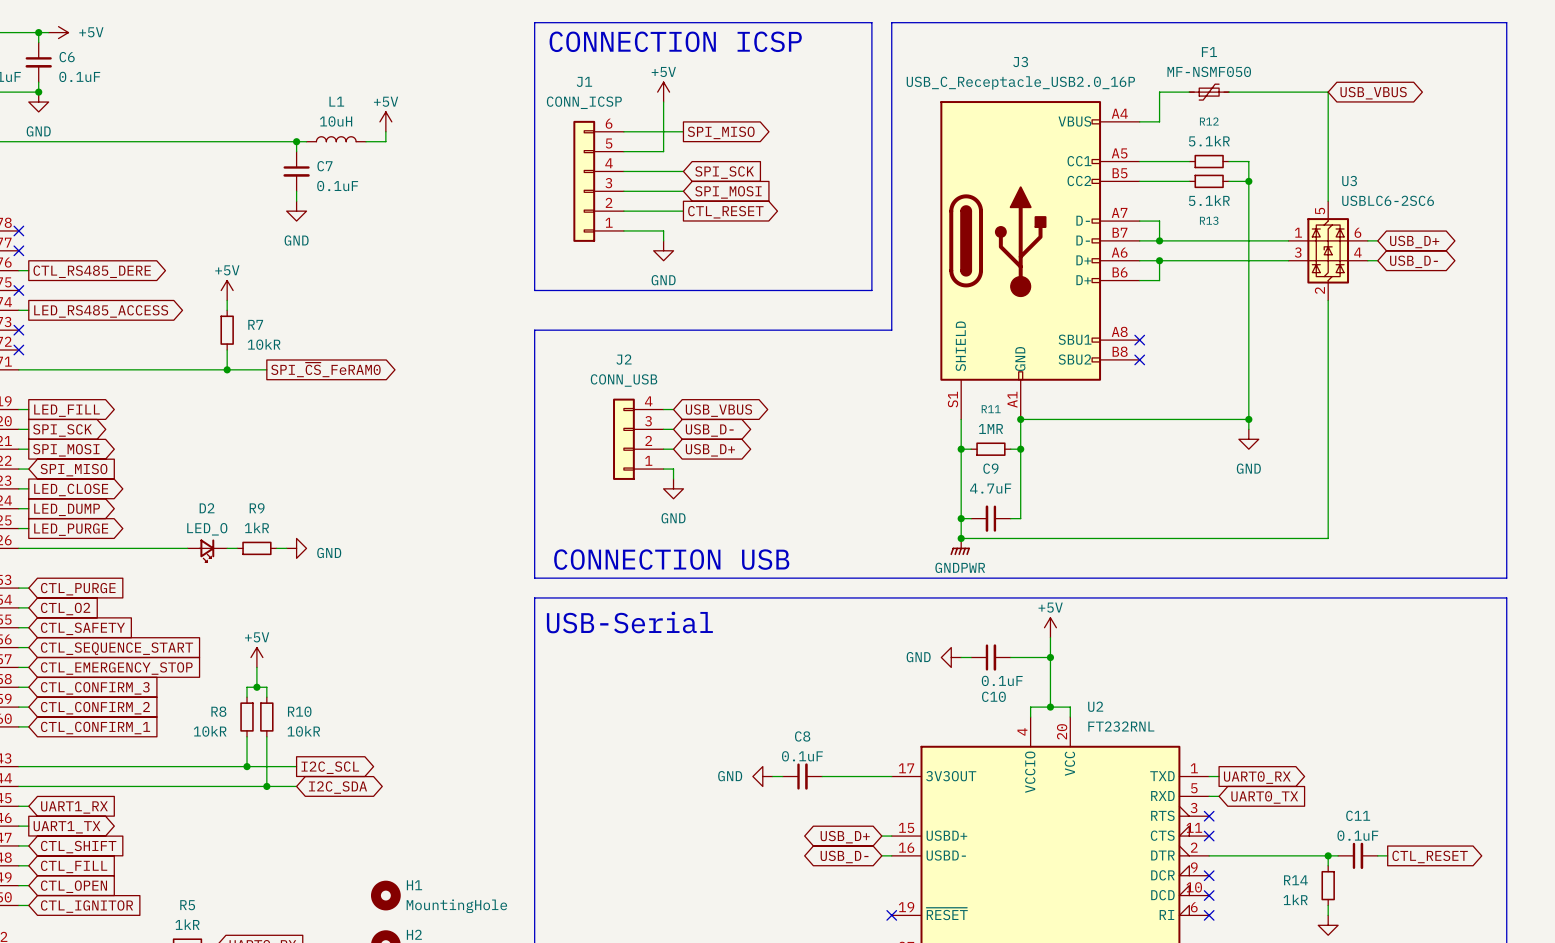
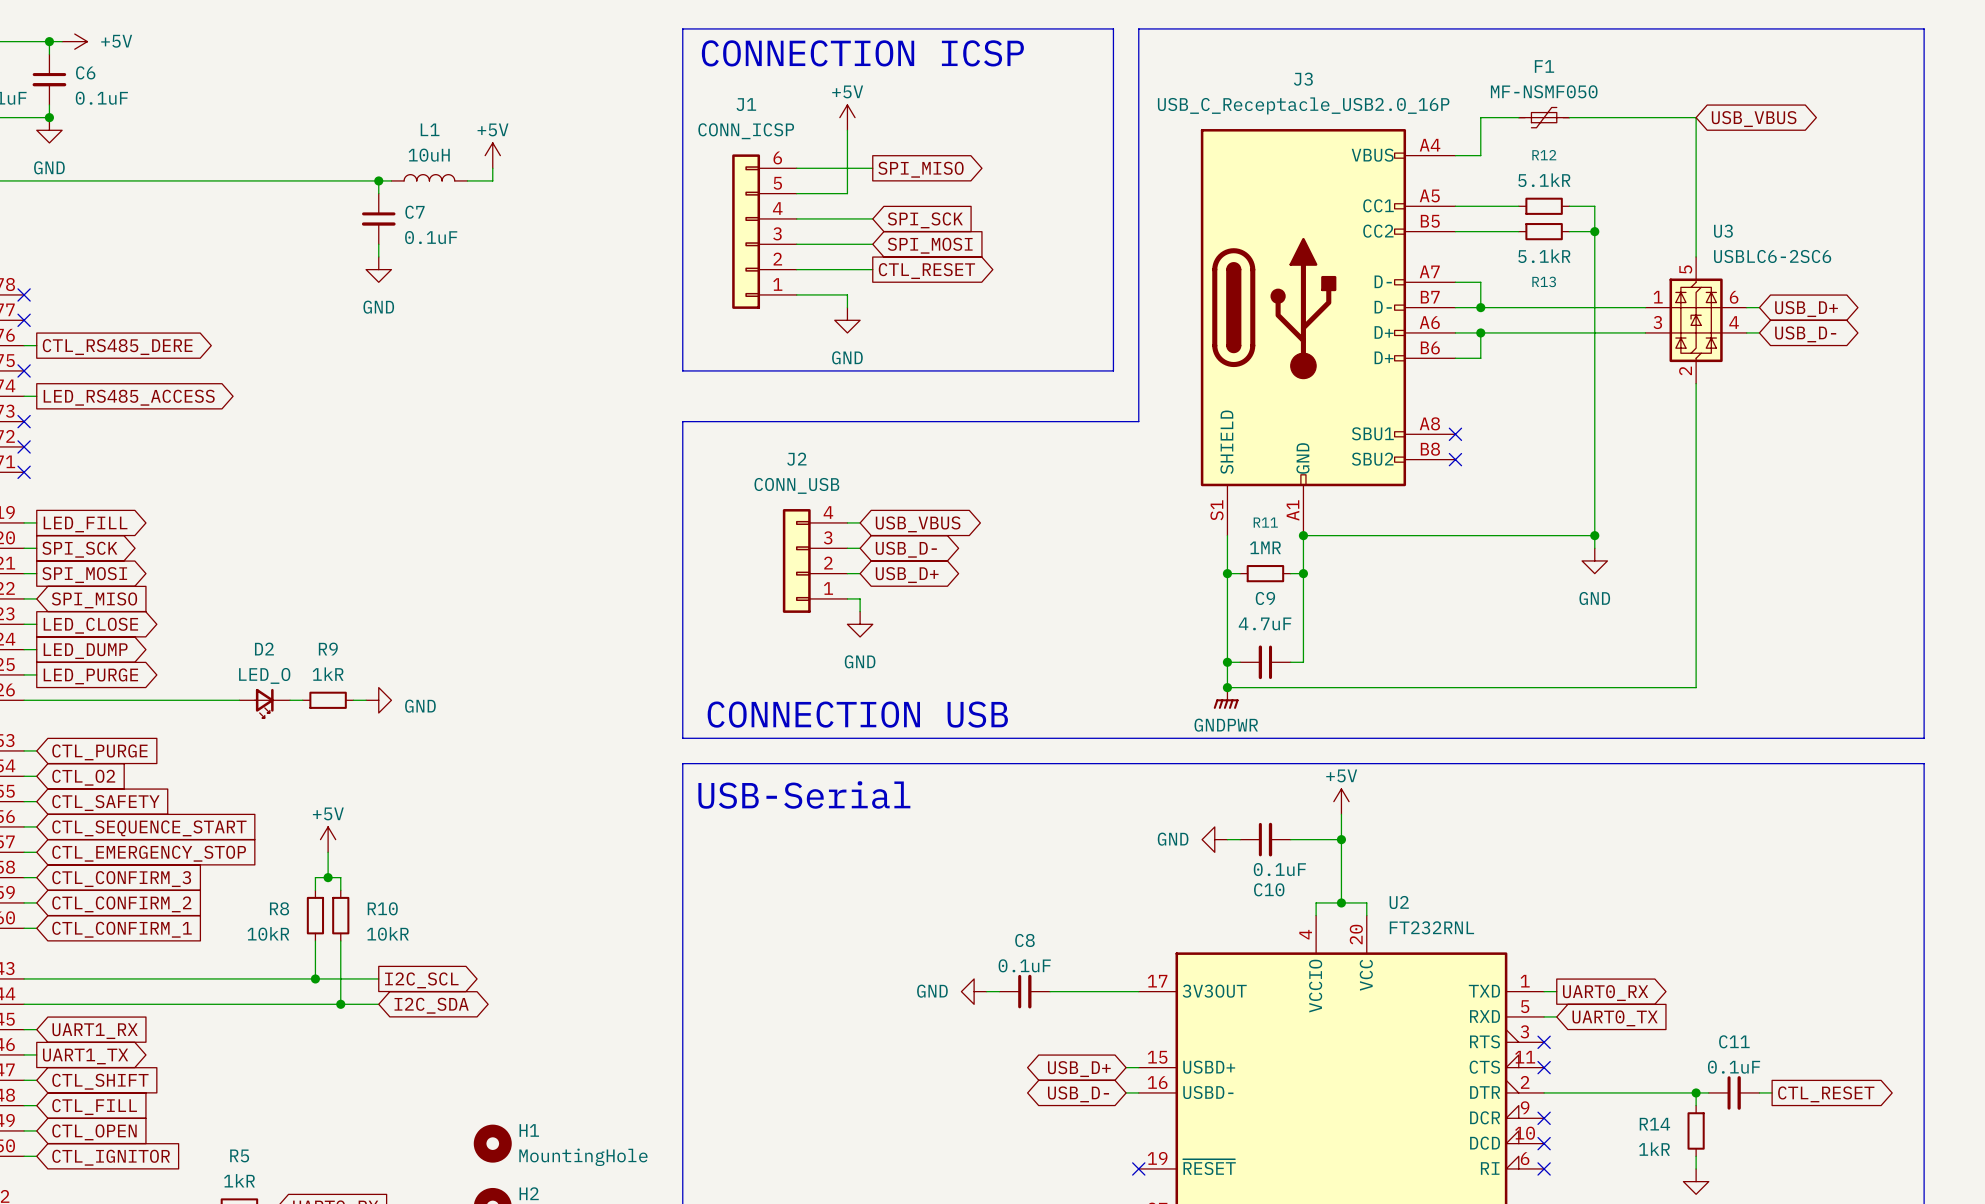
power symbol: +5V (227, 290) -> none
wire: (227, 300) (227, 310) -> none
R7: 10kR (227, 330) -> none
wire: (227, 350) (227, 369) -> none
wire: (18, 369) (266, 369) -> none
no-connect mark: none -> (24, 472)
junction: (227, 369) -> none
global label: SPI_~{CS}_FeRAM0 (325, 369) -> none

